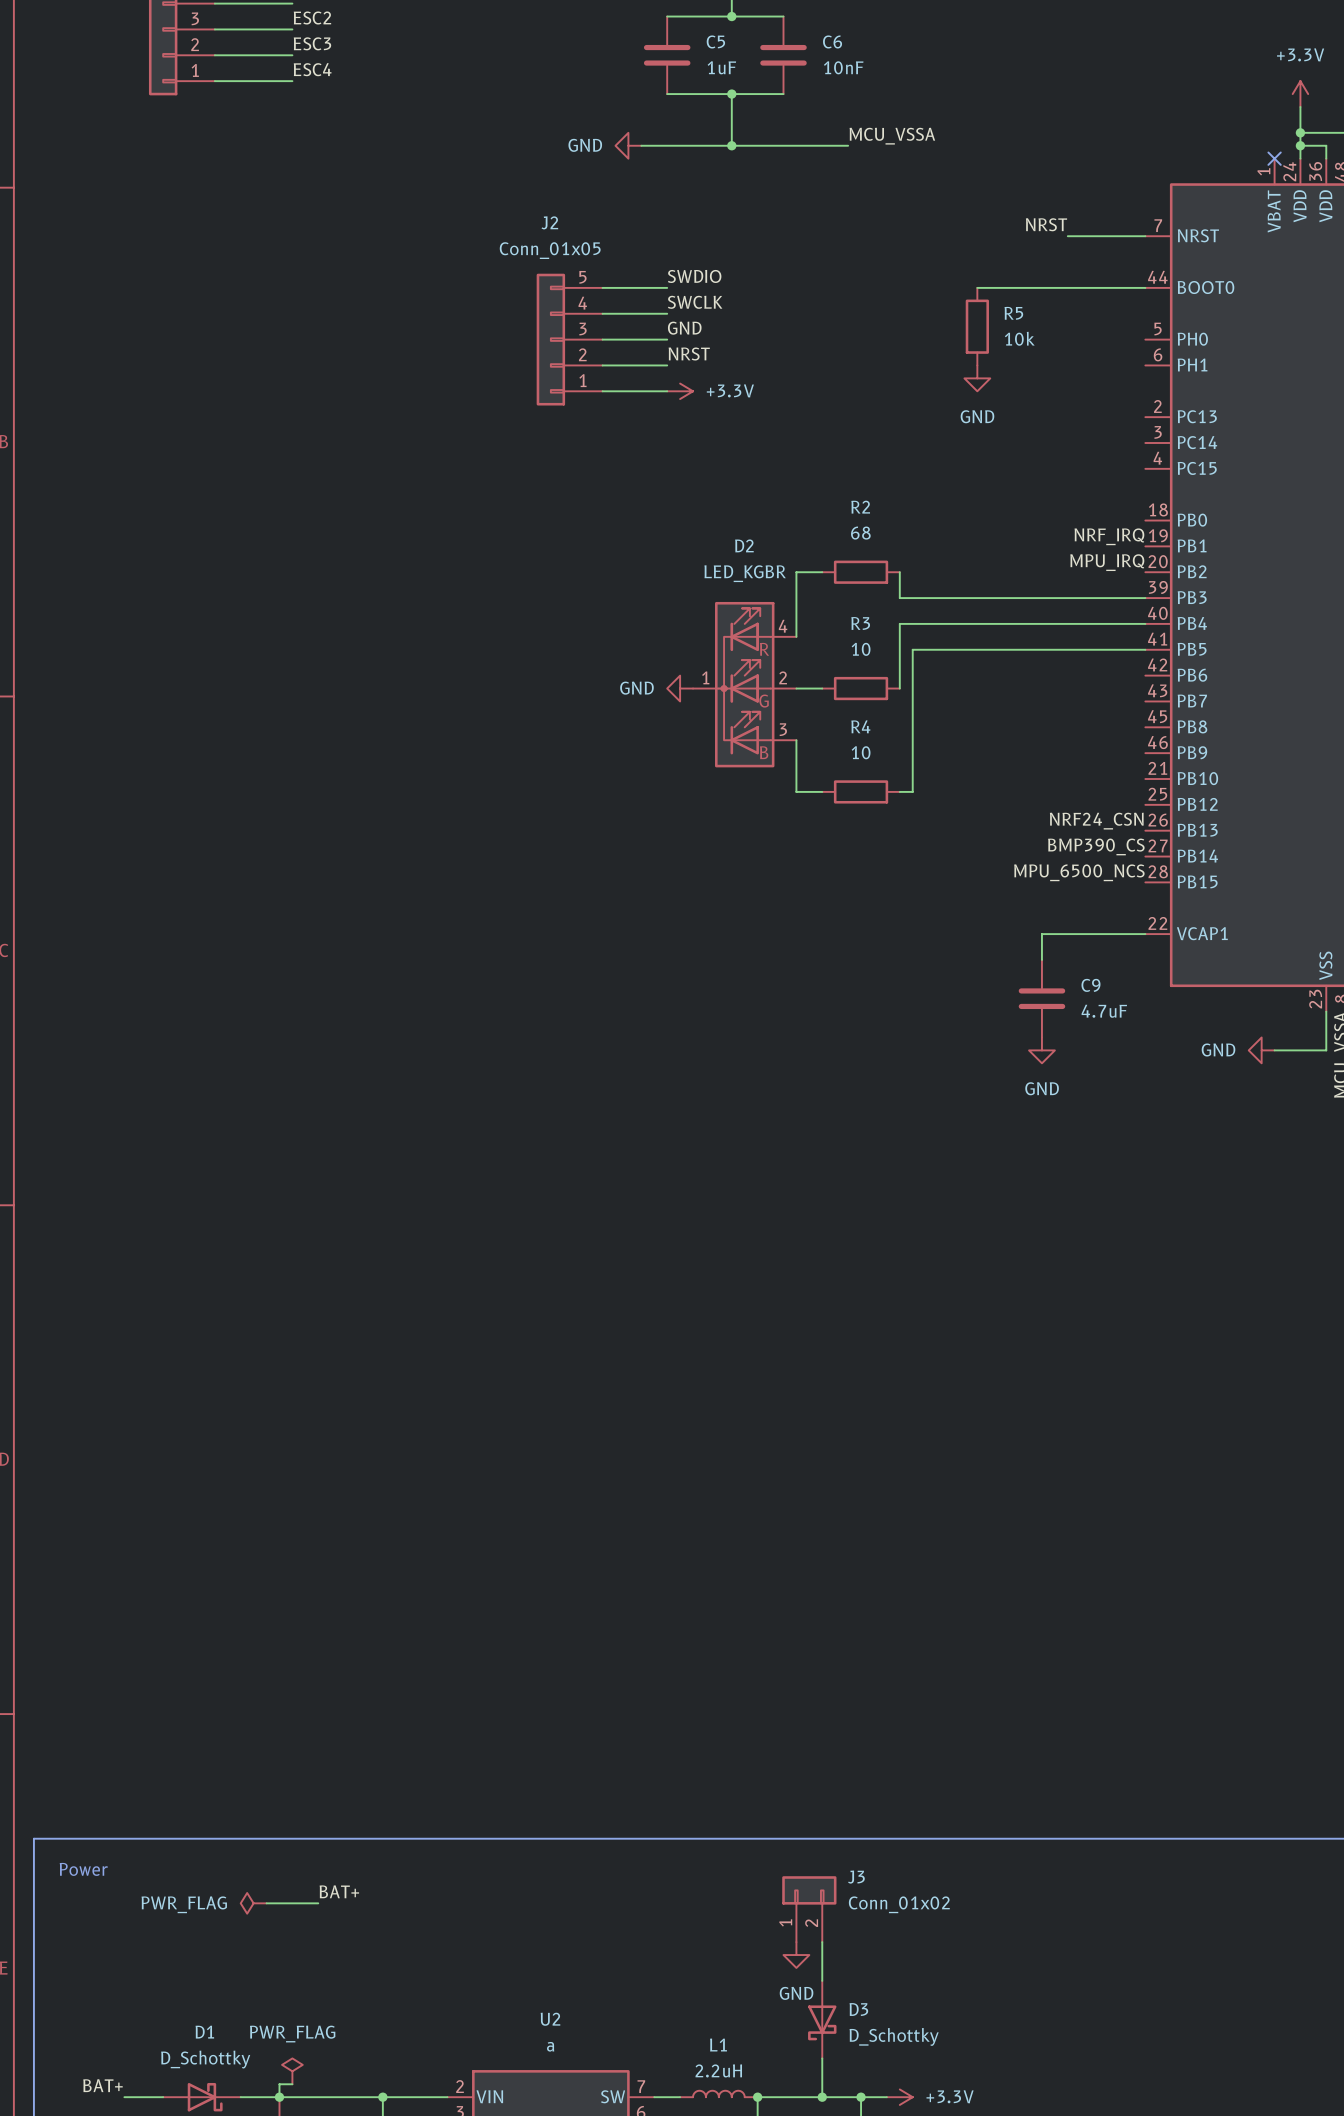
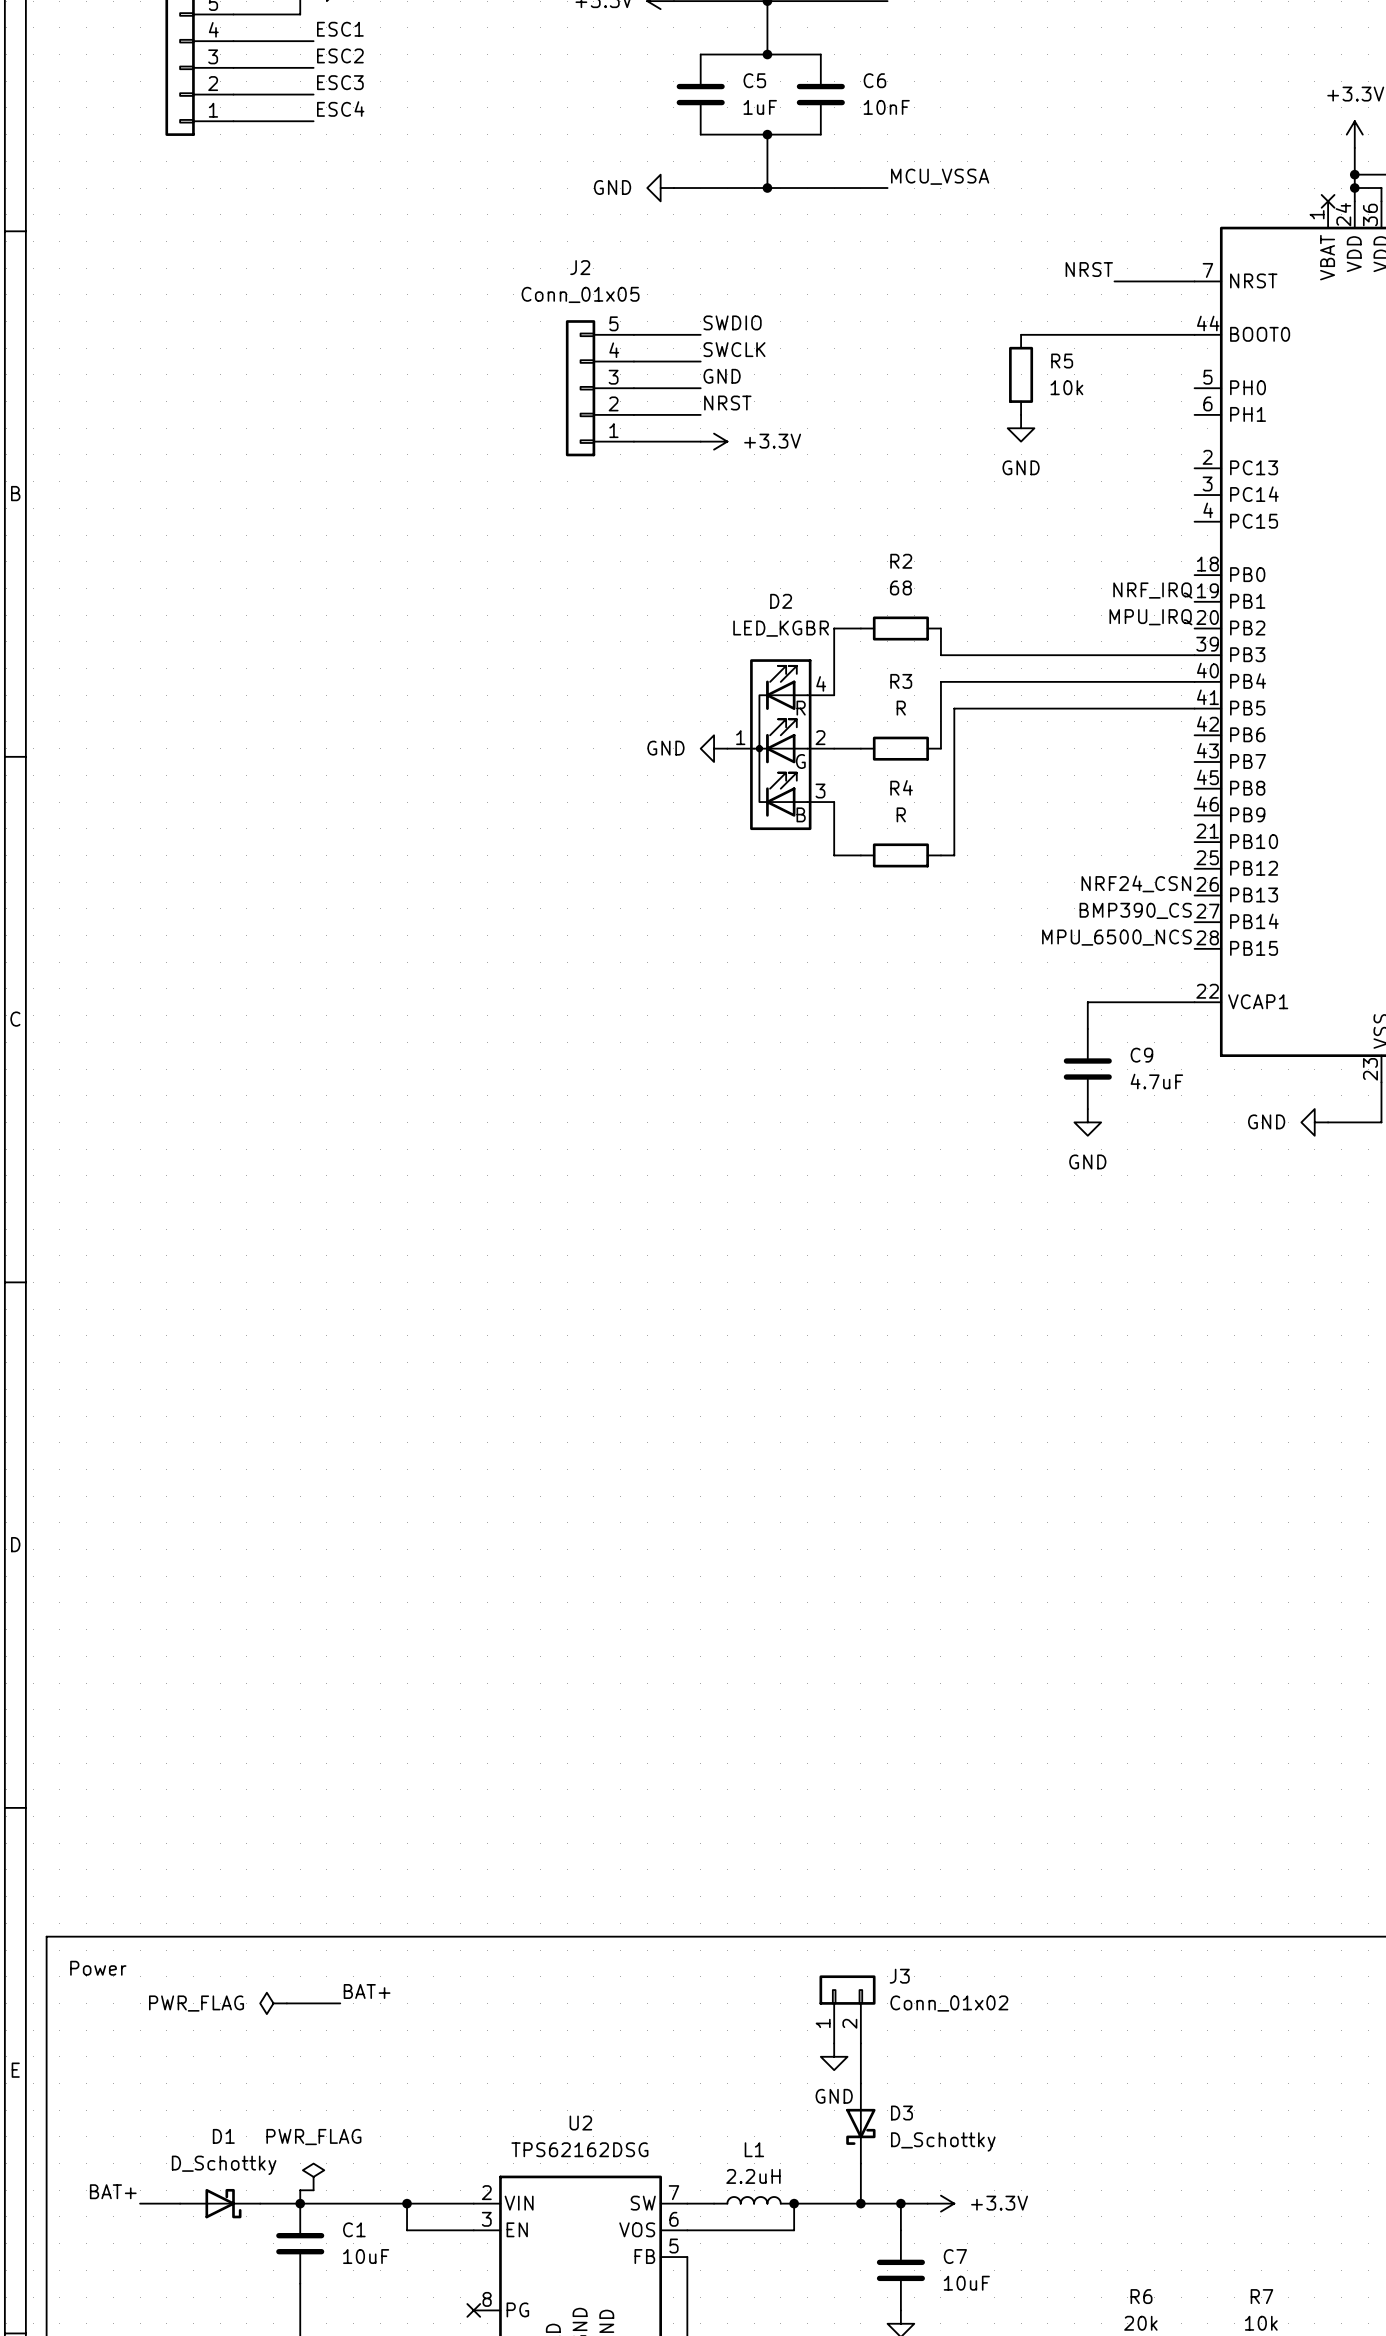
R3 value: 10 (861, 649) -> R (901, 708)
R4 value: 10 (861, 752) -> R (901, 814)
U2 value: a (550, 2046) -> TPS62162DSG (579, 2149)

